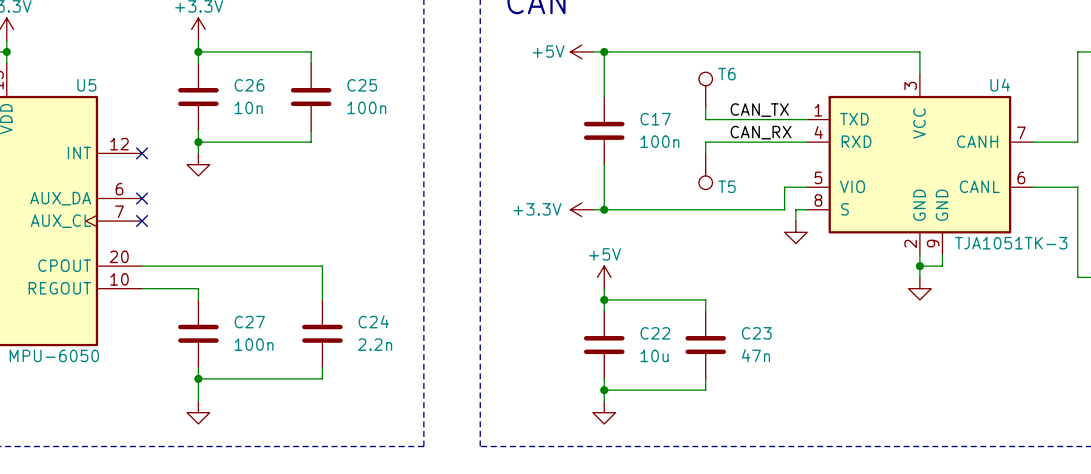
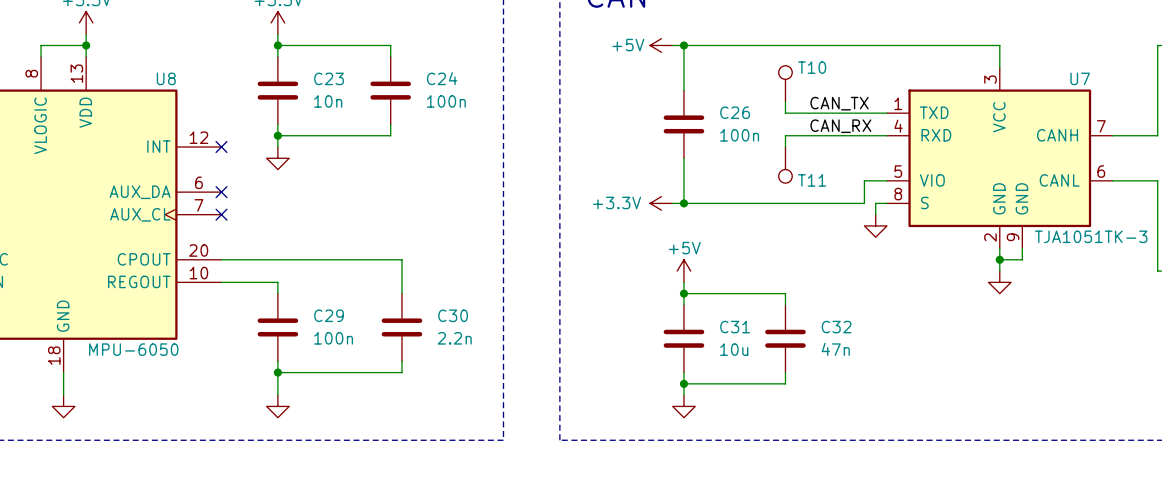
T6 name: T6 (727, 74) -> T10 (812, 67)
U5 name: U5 (86, 85) -> U8 (166, 78)
C26 name: C26 (249, 85) -> C23 (329, 78)
C25 name: C25 (362, 85) -> C24 (442, 78)
U4 name: U4 (1000, 85) -> U7 (1080, 78)
C17 name: C17 (655, 119) -> C26 (735, 112)
T5 name: T5 (727, 186) -> T11 (812, 180)
C24 name: C24 (373, 321) -> C30 (453, 315)
C27 name: C27 (249, 322) -> C29 (329, 315)
C22 name: C22 (655, 333) -> C31 (735, 327)
C23 name: C23 (756, 333) -> C32 (836, 327)

